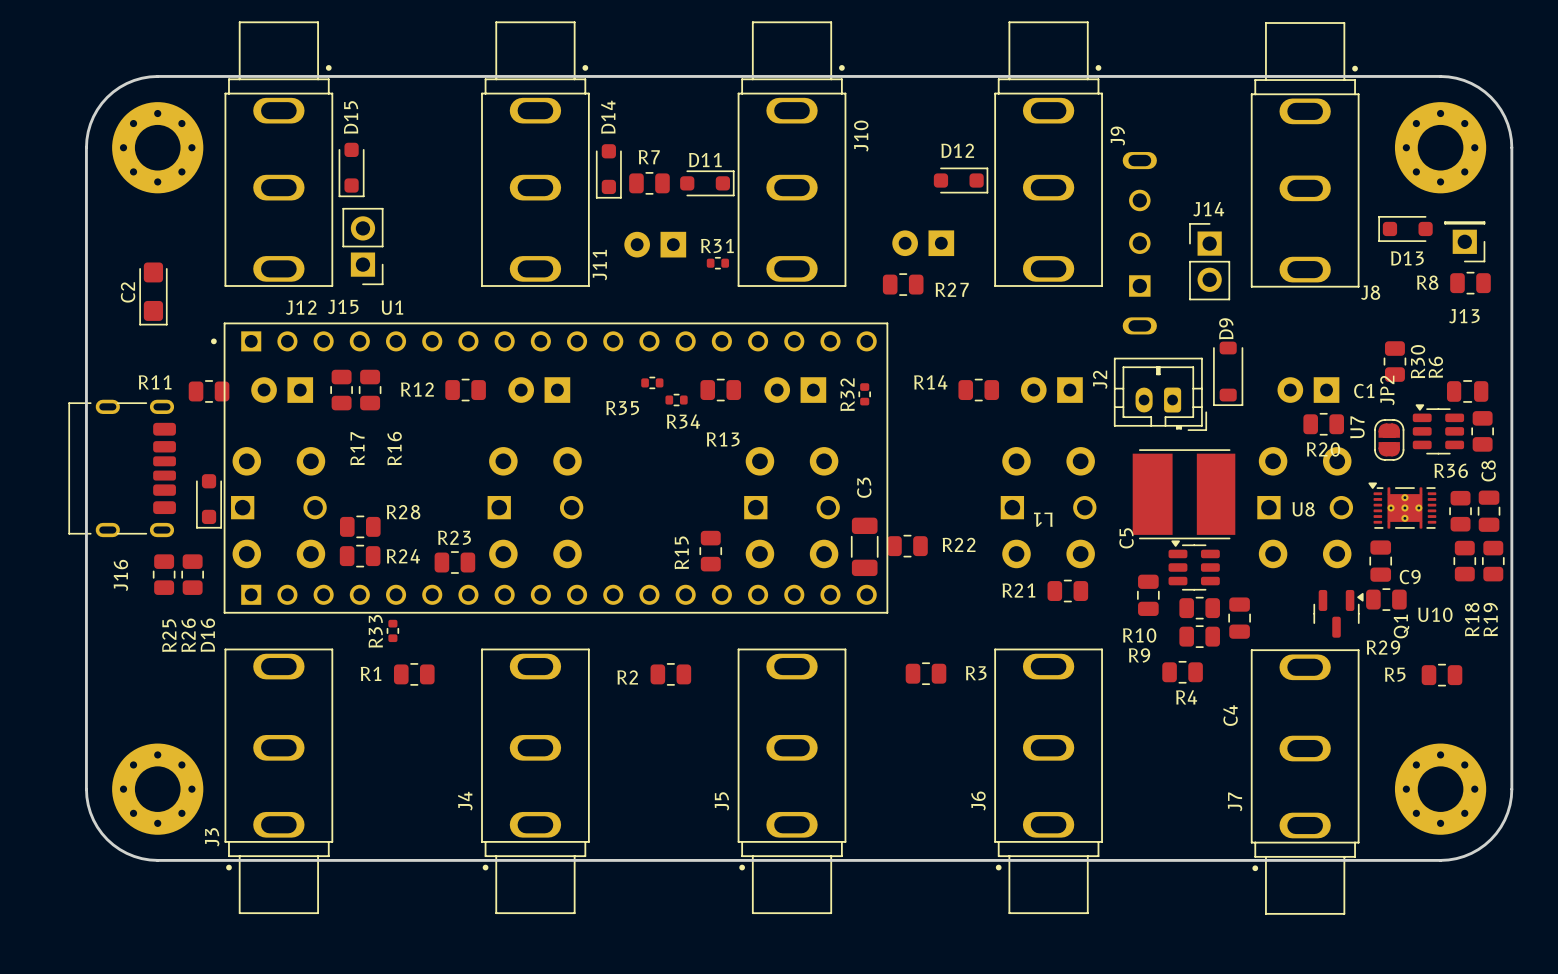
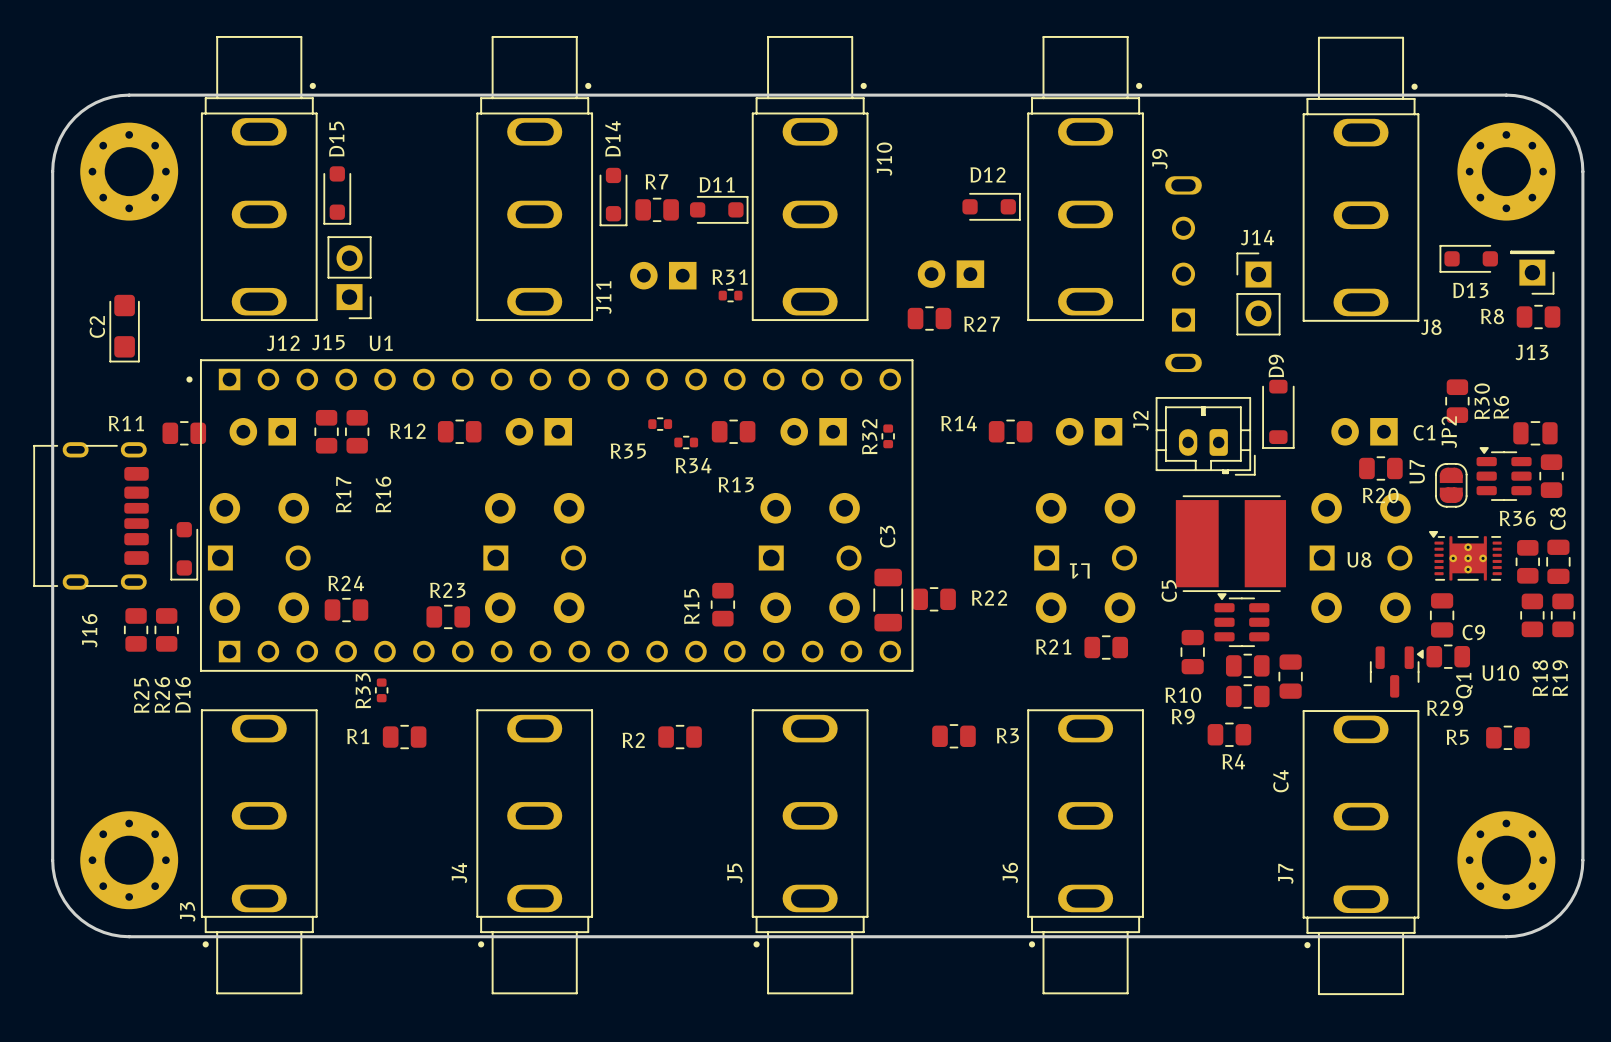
R28: (360, 526) -> none
R24 name position: R24 (403, 556) -> R24 (346, 583)

